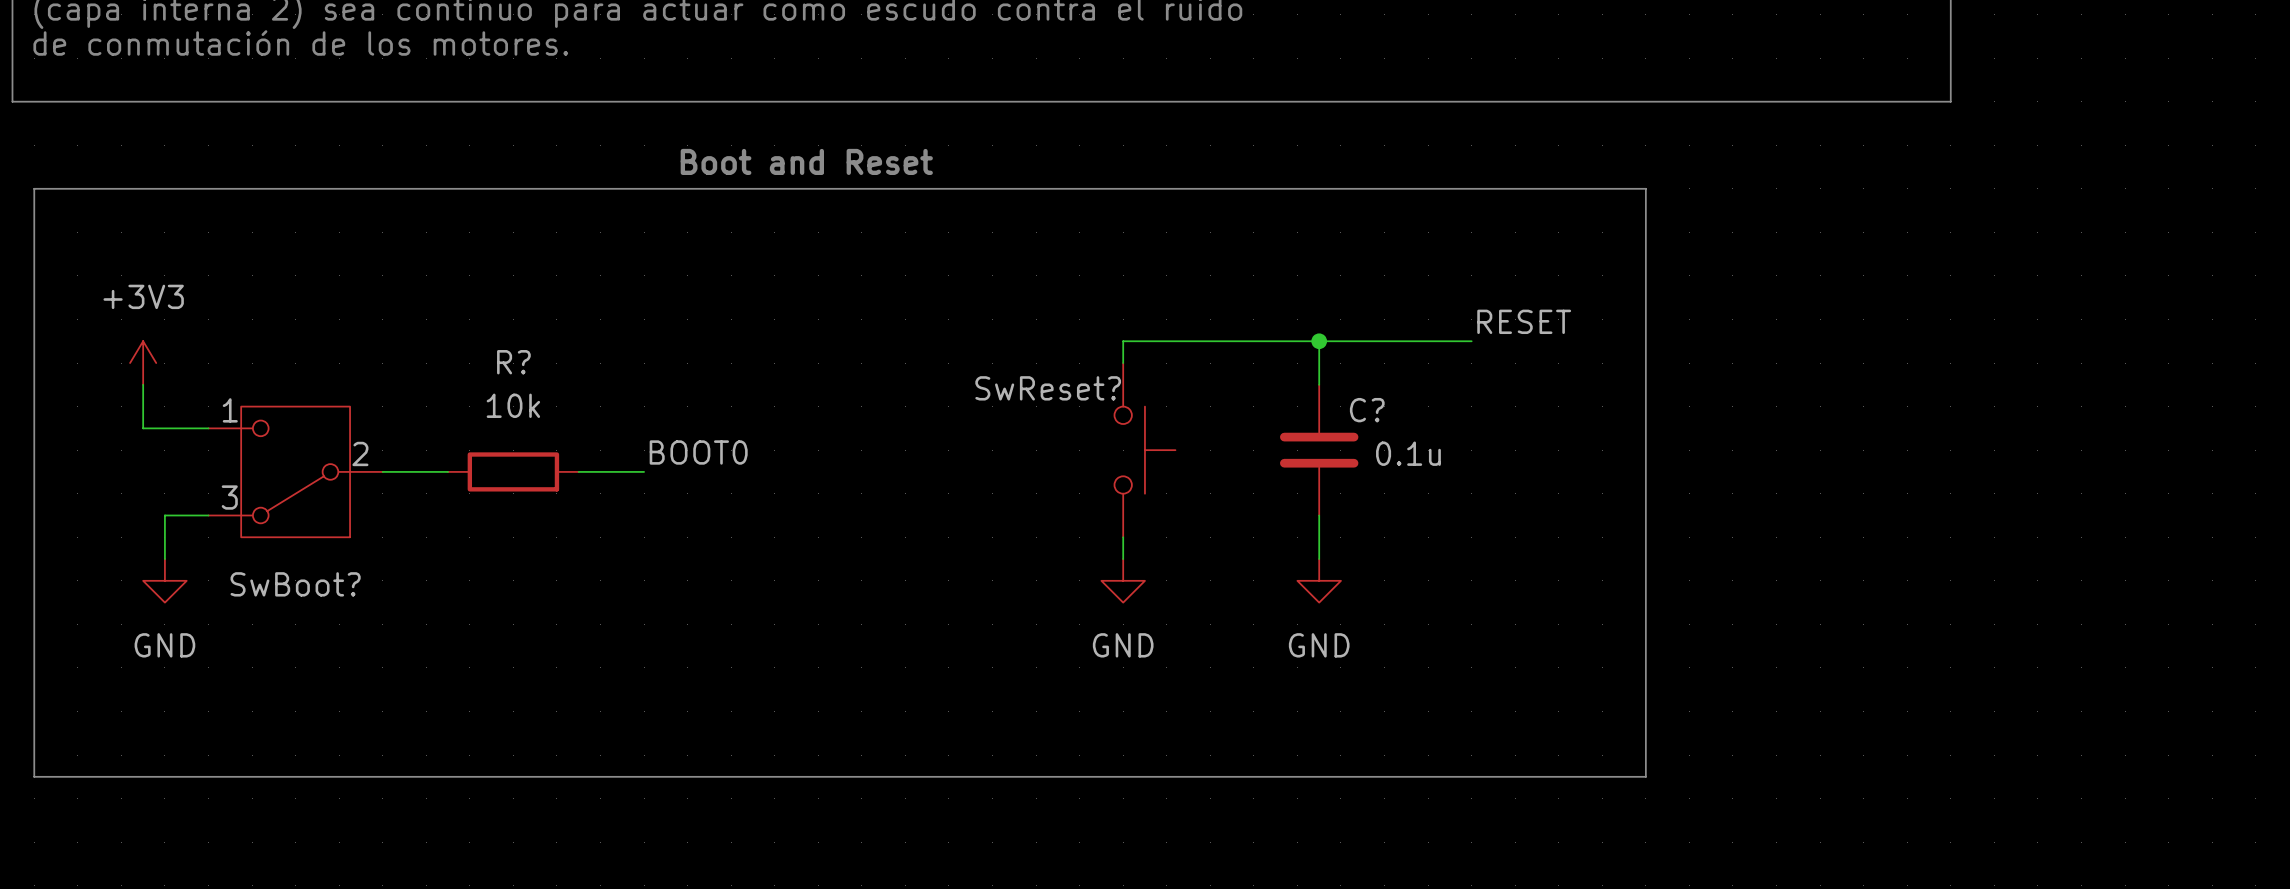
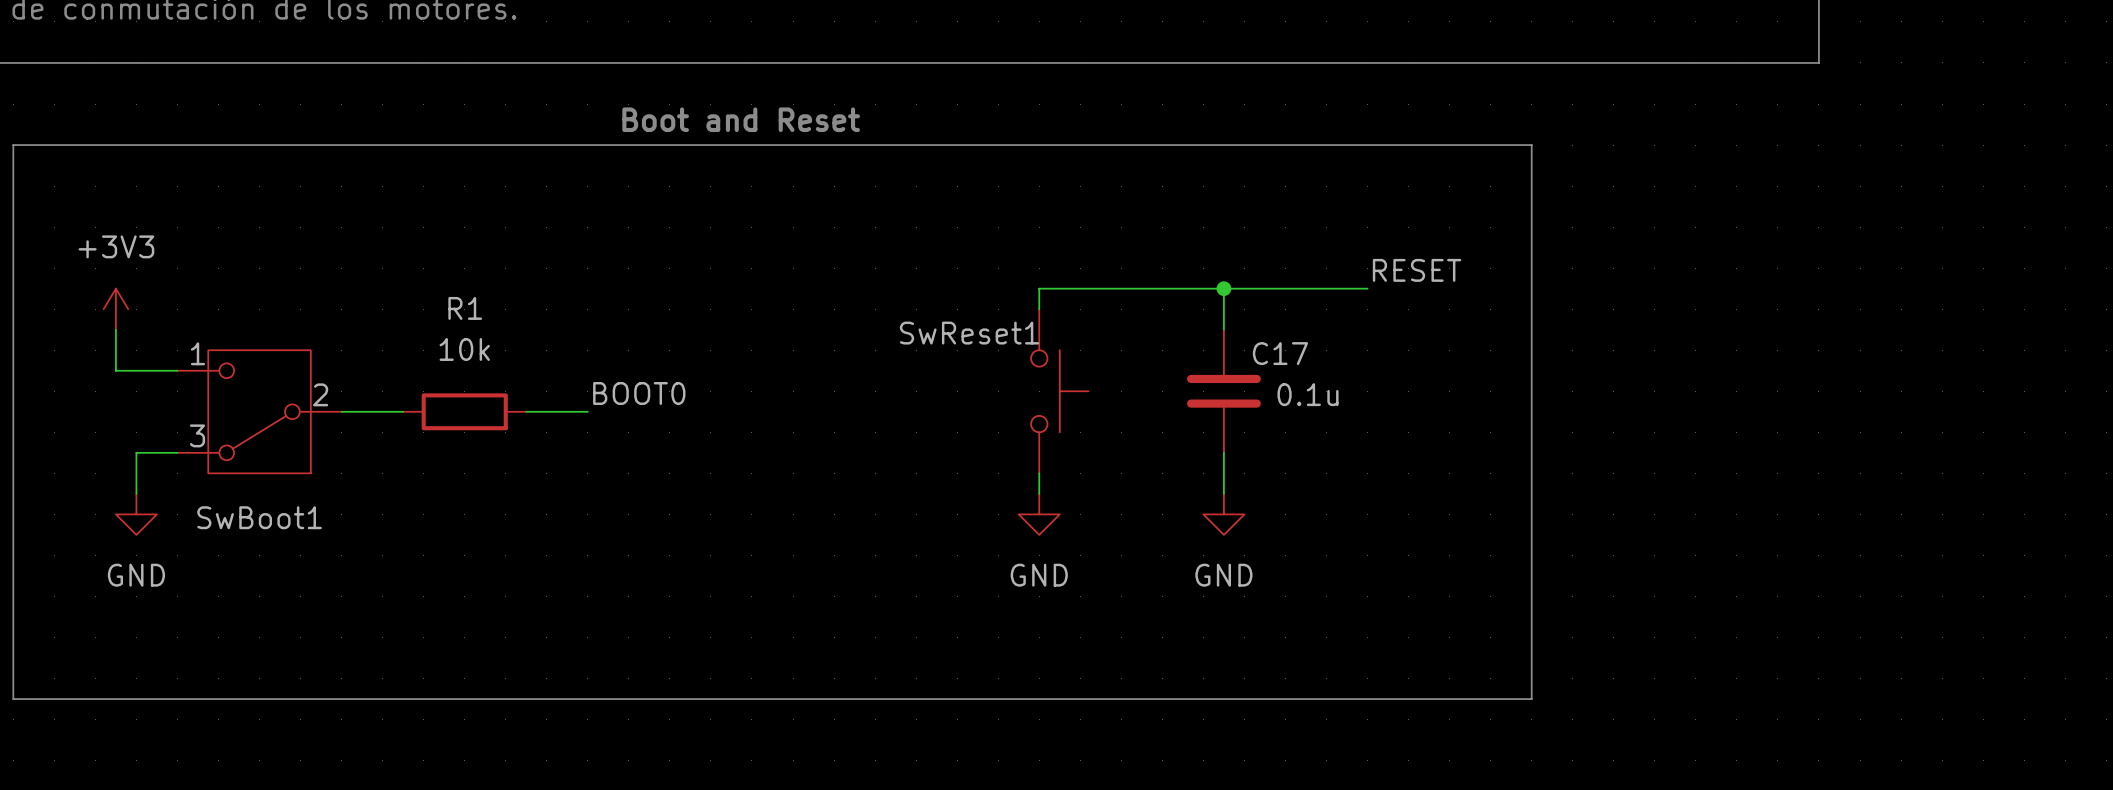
R? name: R? (513, 362) -> R1 (465, 308)
SwReset? name: SwReset? (1048, 388) -> SwReset1 (969, 333)
C? name: C? (1367, 410) -> C17 (1280, 353)
SwBoot? name: SwBoot? (295, 584) -> SwBoot1 (259, 517)

